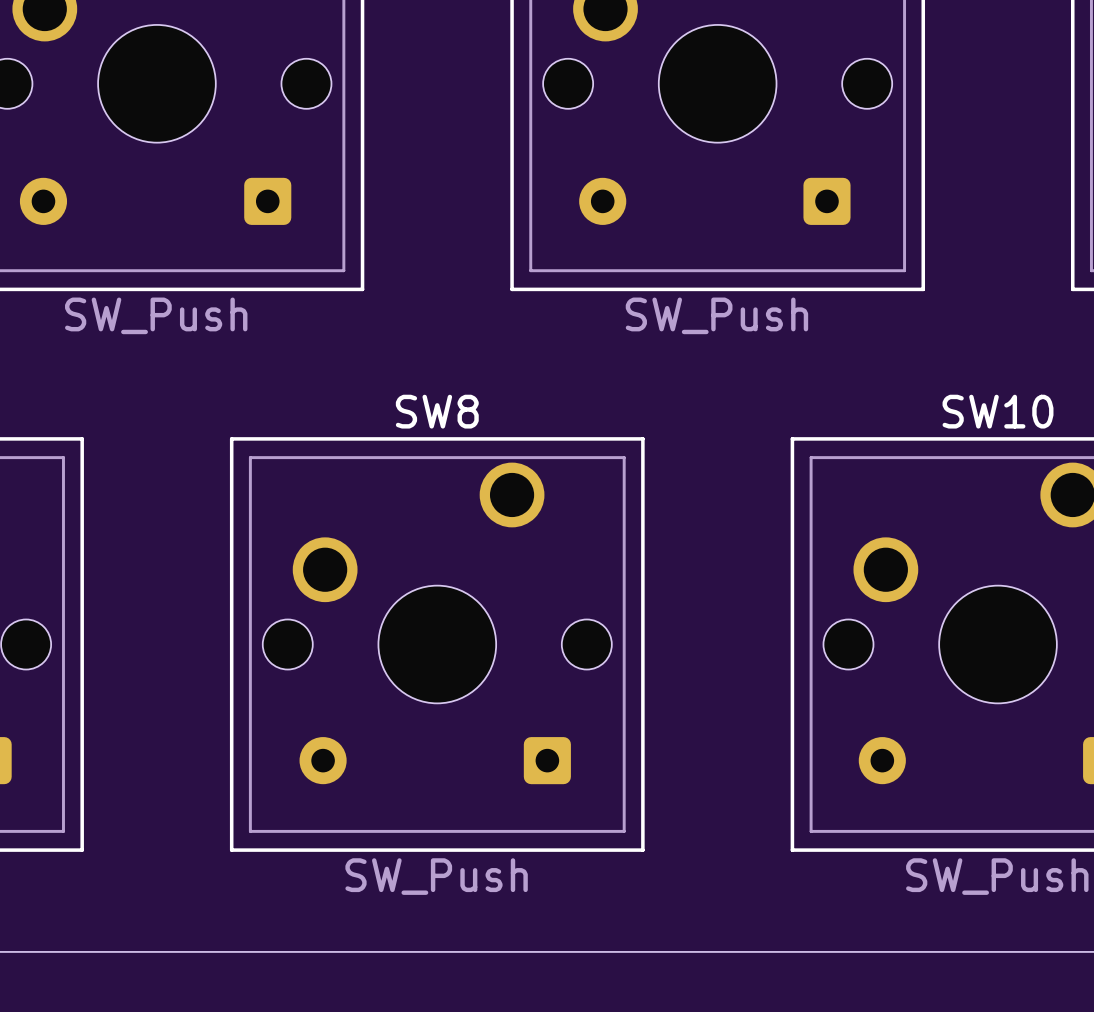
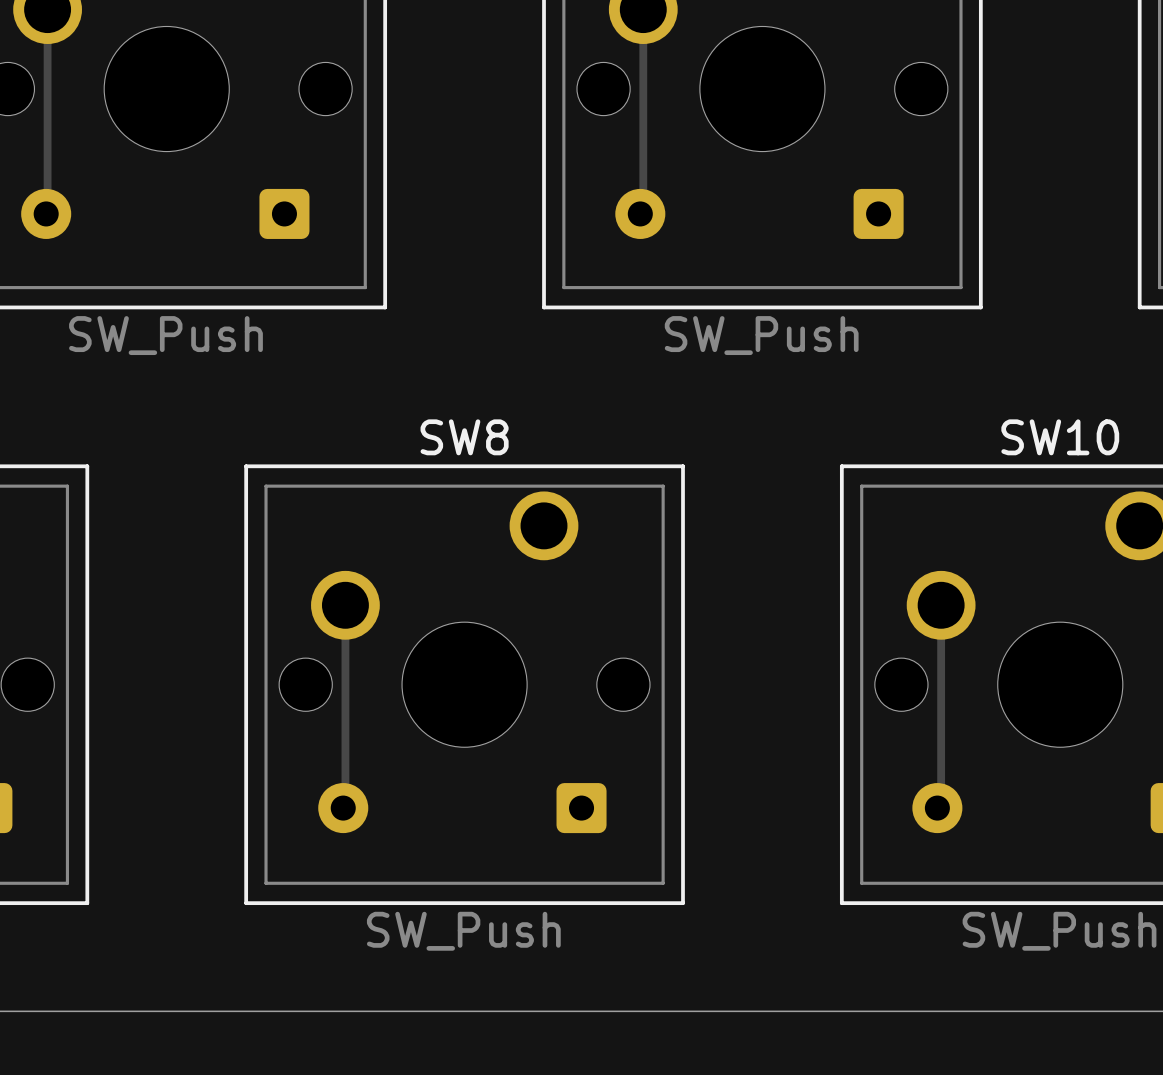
track: none -> (47, 9) (46, 213)
track: none -> (643, 9) (643, 210) (640, 213)
track: none -> (345, 605) (345, 805) (343, 808)
track: none -> (941, 605) (941, 804) (937, 808)

